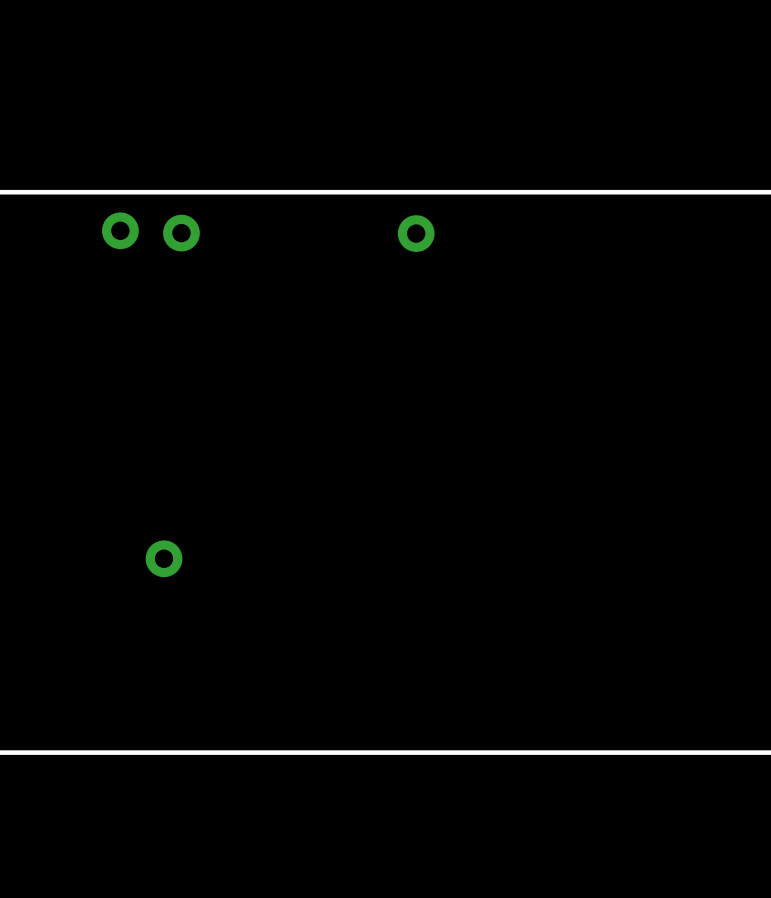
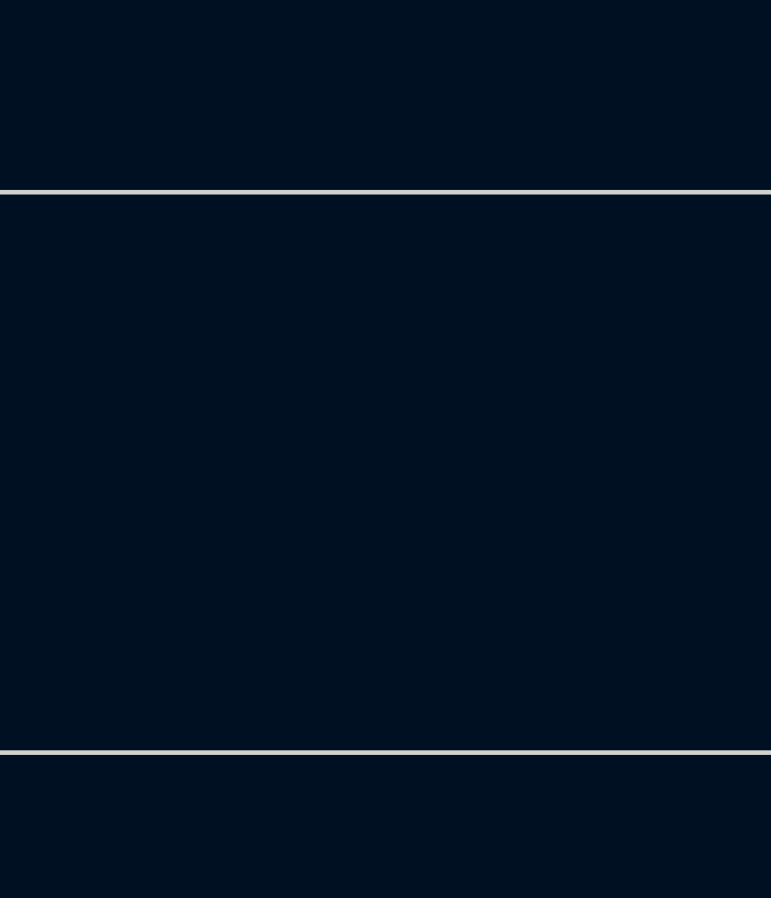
via: (120, 230) -> none
via: (181, 233) -> none
via: (416, 233) -> none
via: (164, 558) -> none

